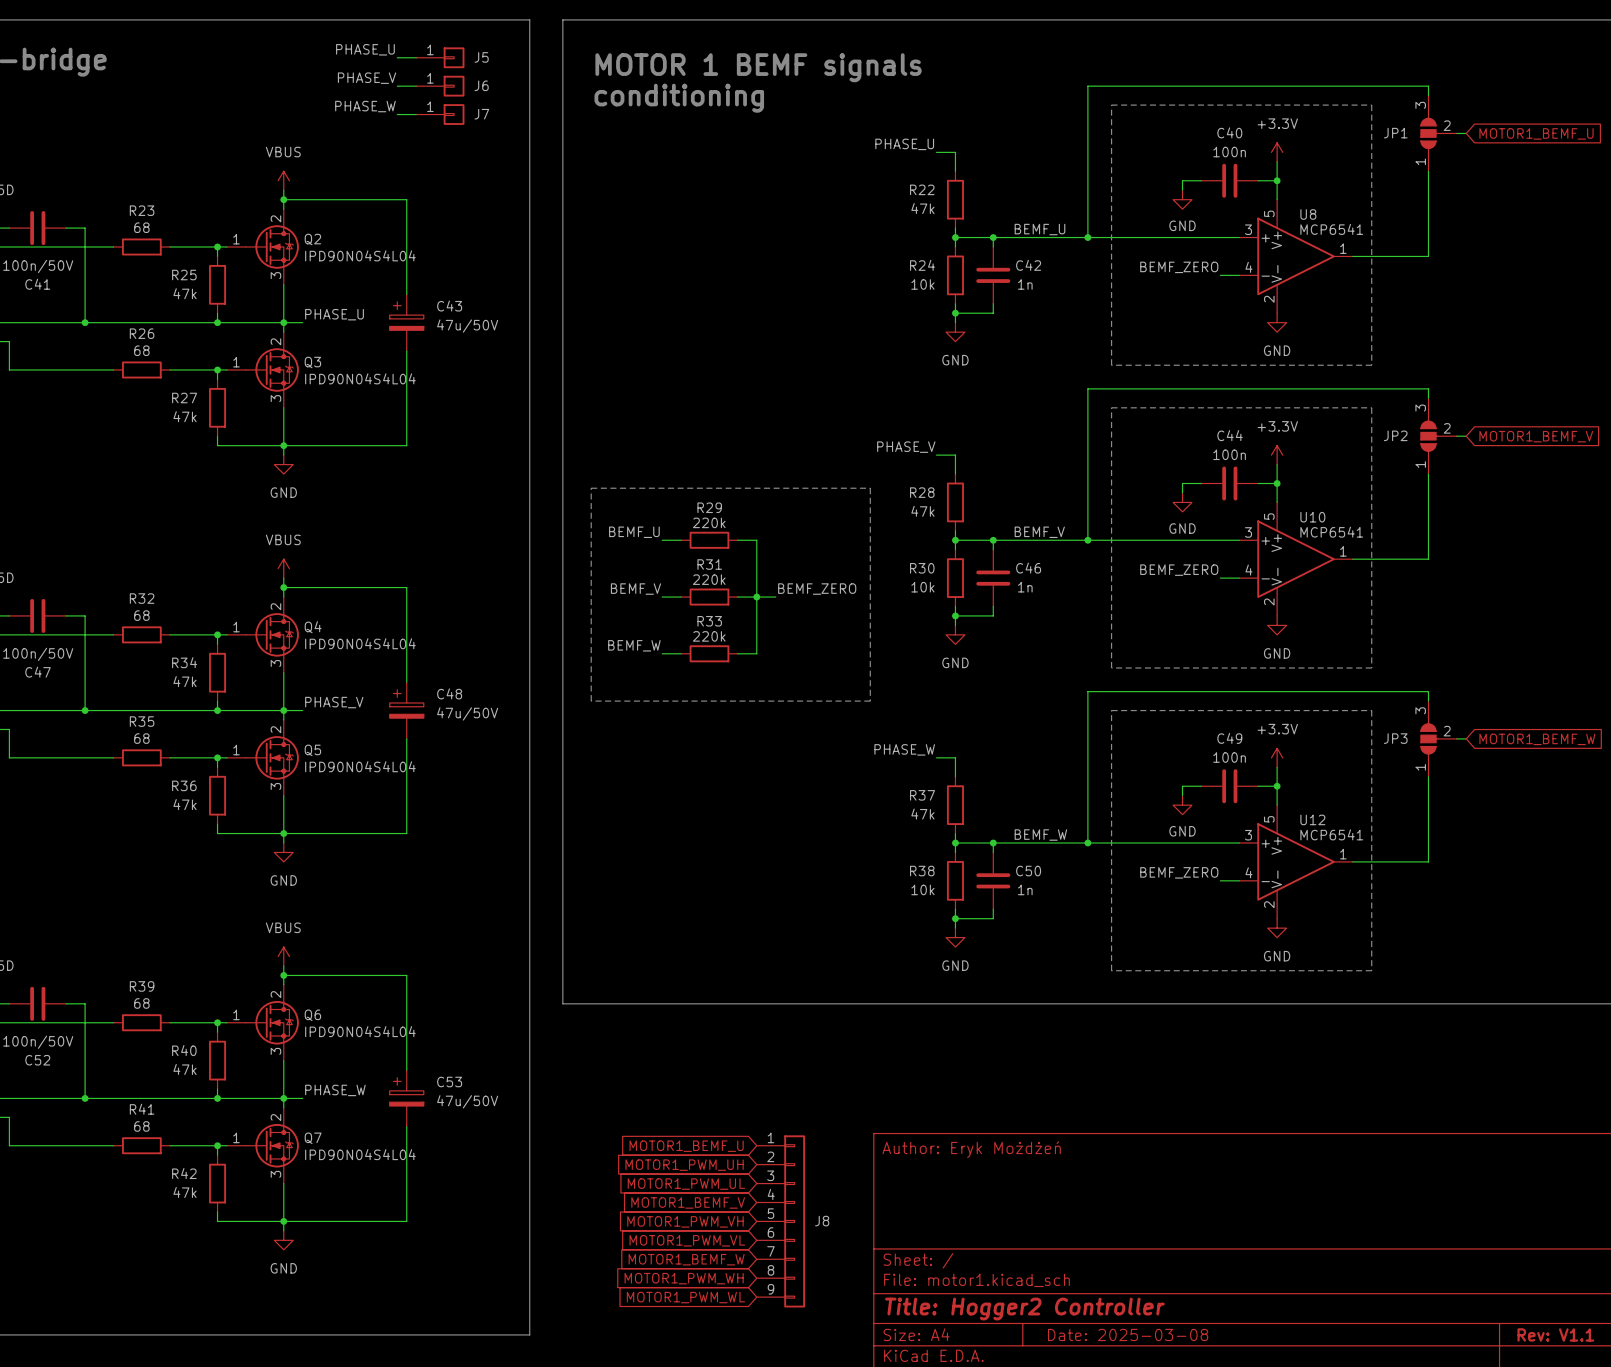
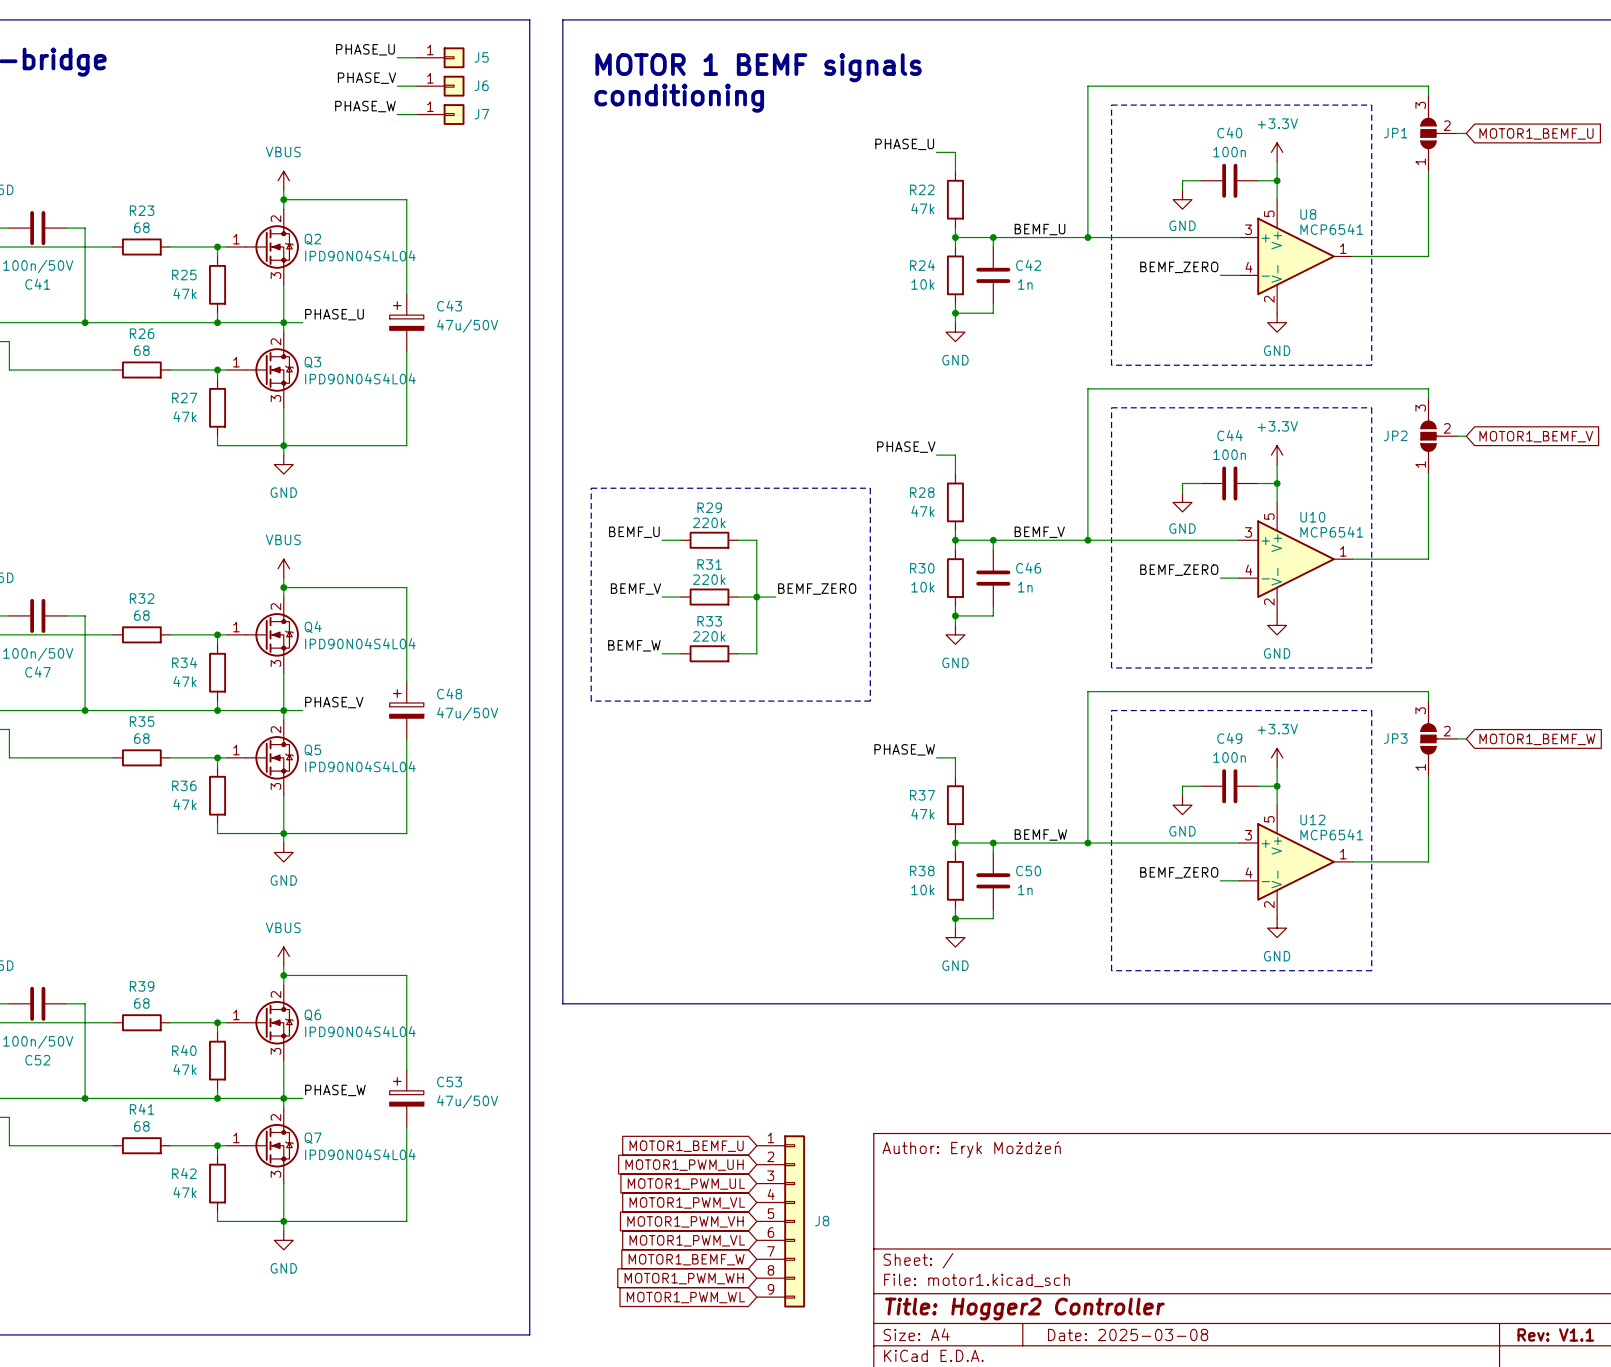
global label: MOTOR1_BEMF_V (688, 1202) -> MOTOR1_PWM_VL (687, 1202)

